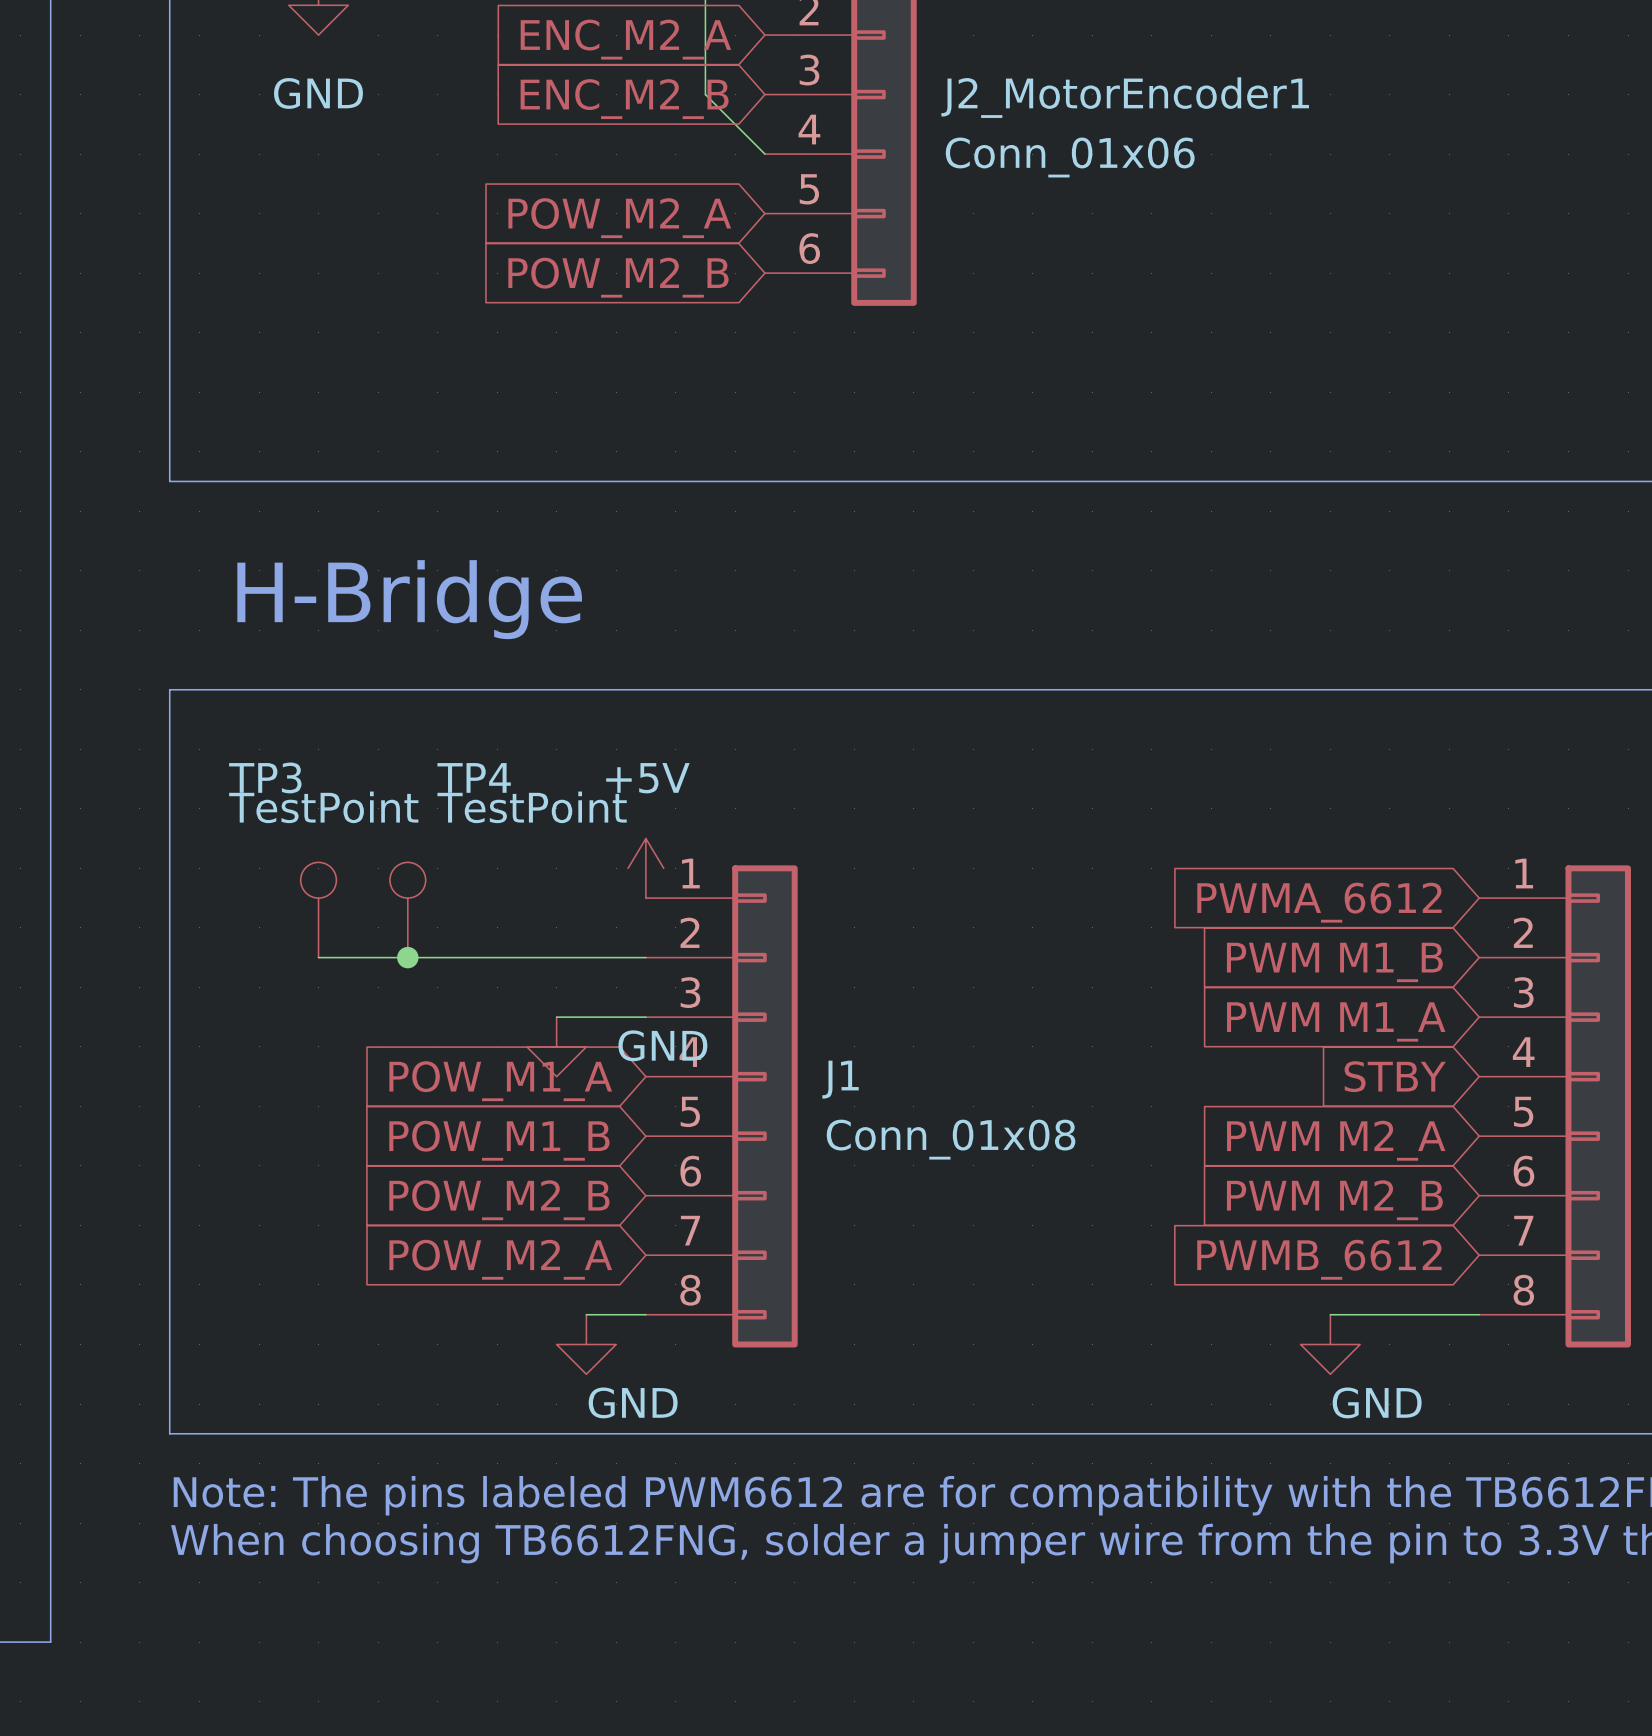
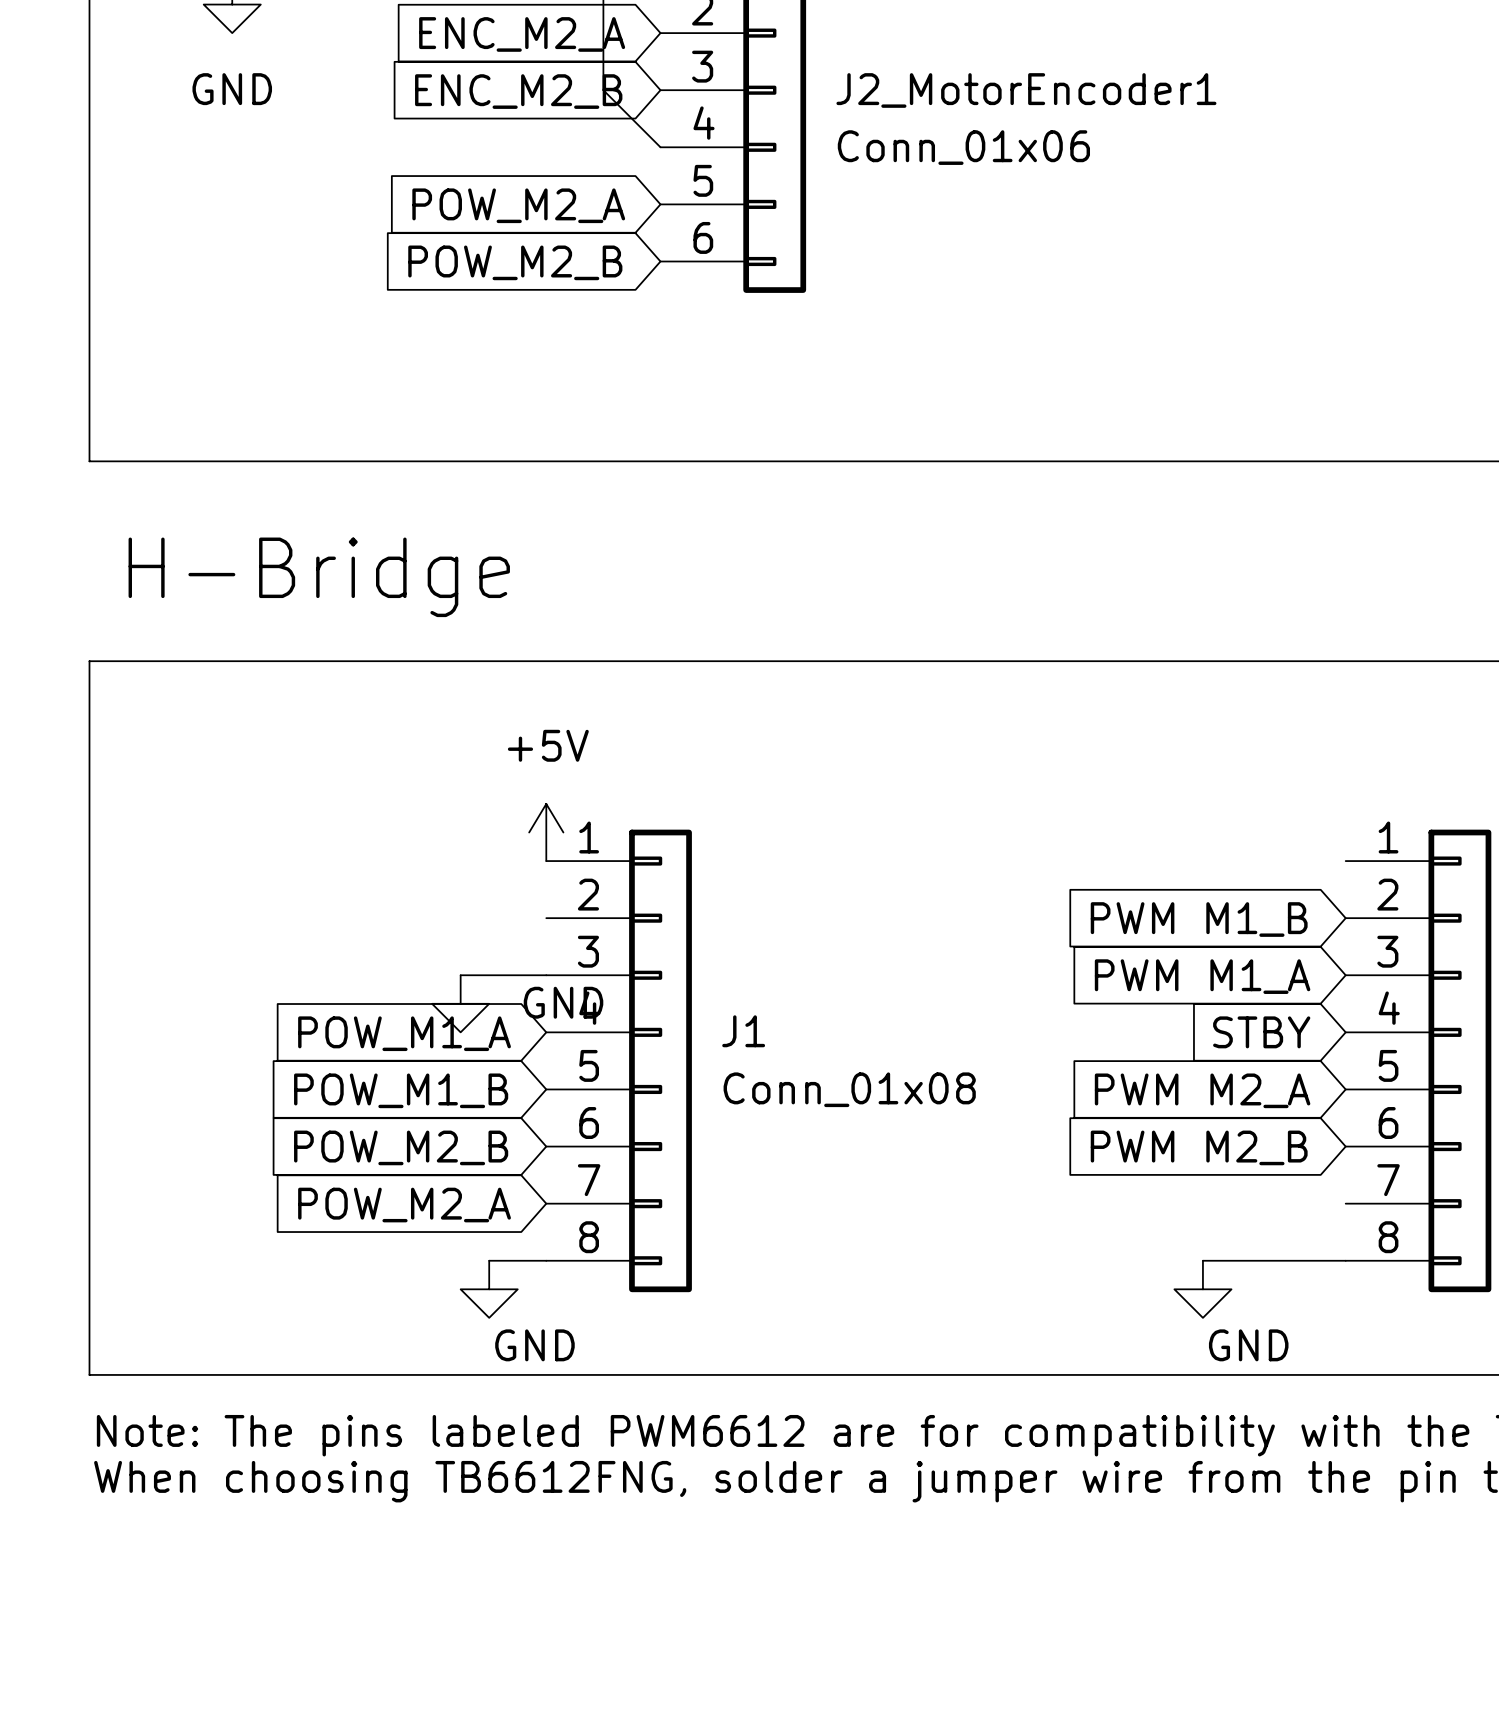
global label: PWMA_6612 (1319, 902) -> none
TP3: TestPoint (318, 909) -> none
TP4: TestPoint (407, 909) -> none
wire: (318, 957) (645, 957) -> none
junction: (407, 957) -> none
global label: PWMB_6612 (1319, 1259) -> none

